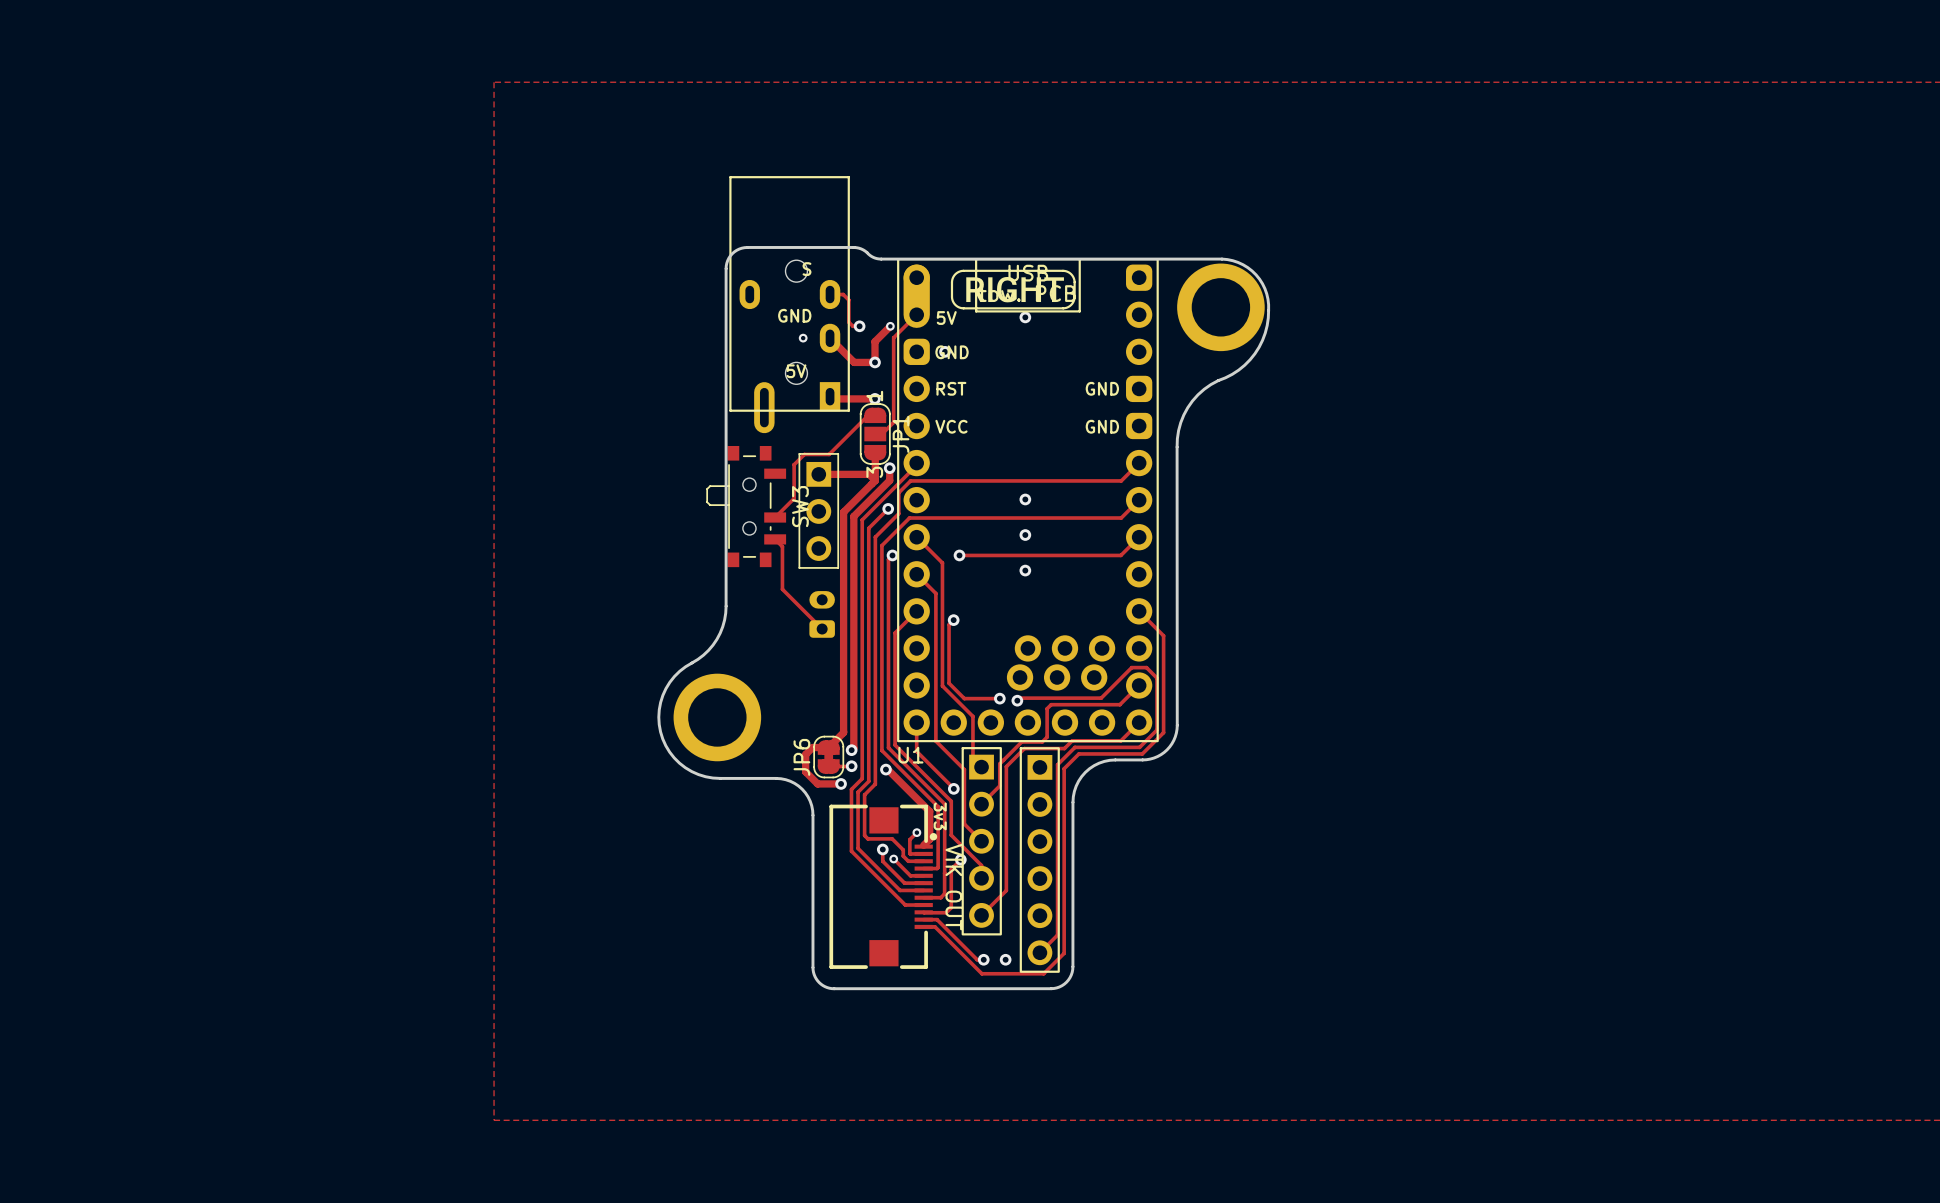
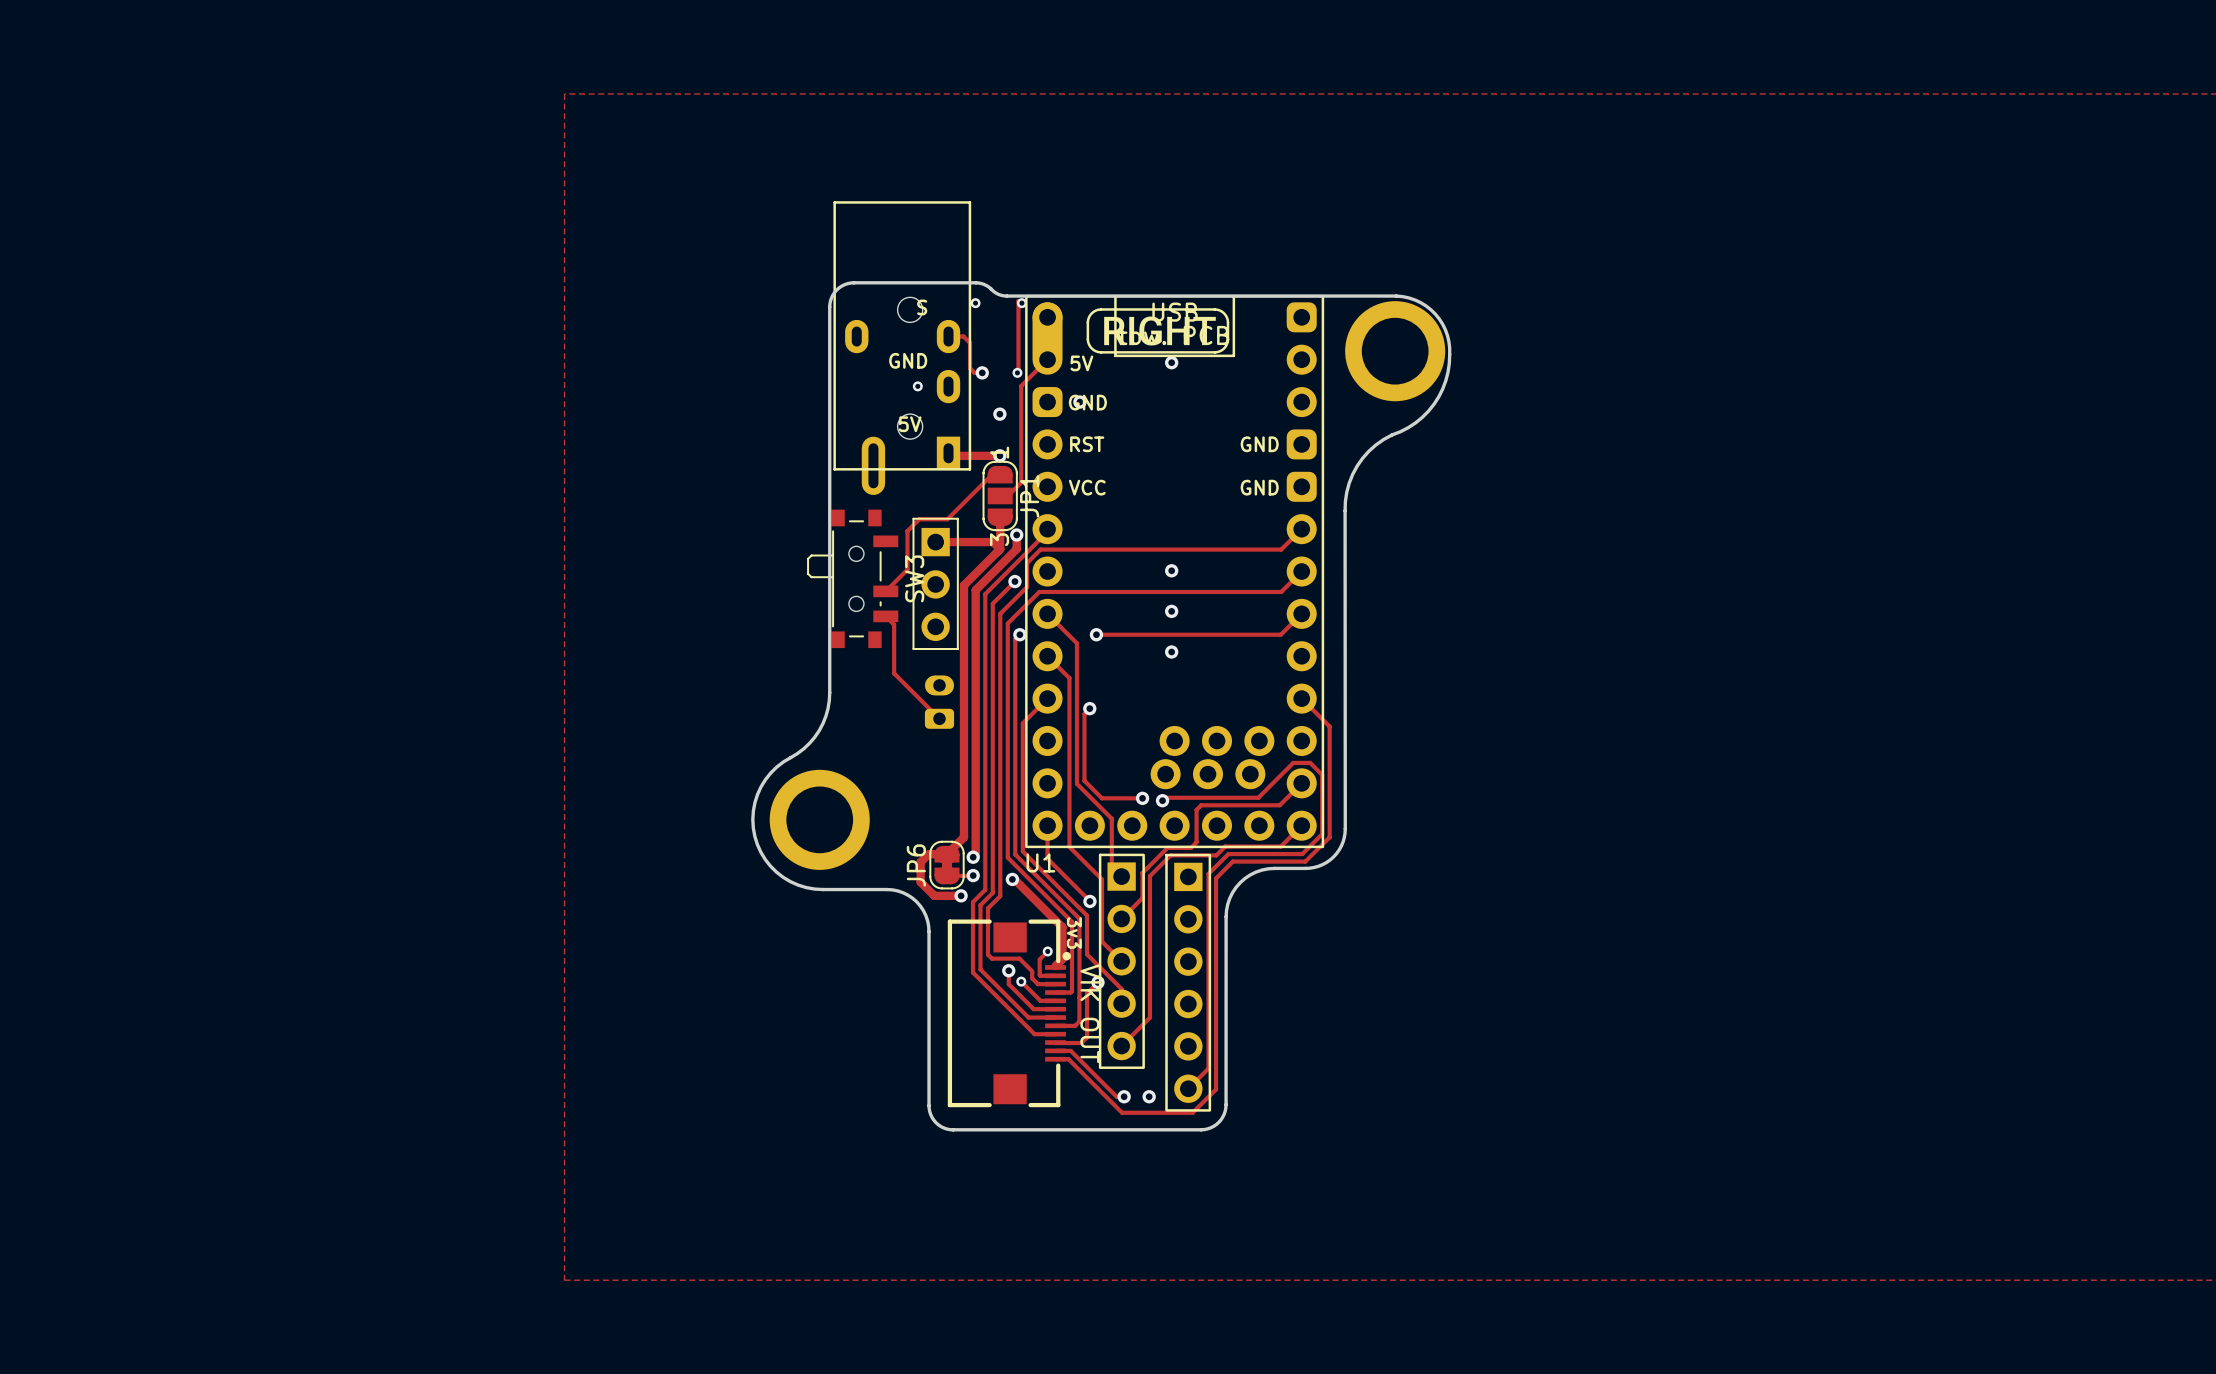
track: none -> (1018, 301) (1018, 371)
via: none -> (975, 303)
via: none -> (1021, 303)
track: (890, 326) (874, 341) (874, 362) (854, 362) (830, 338) -> none

